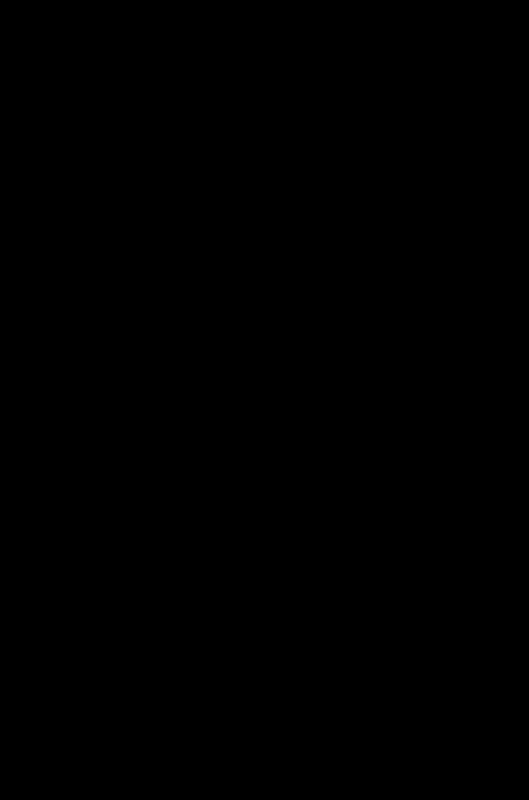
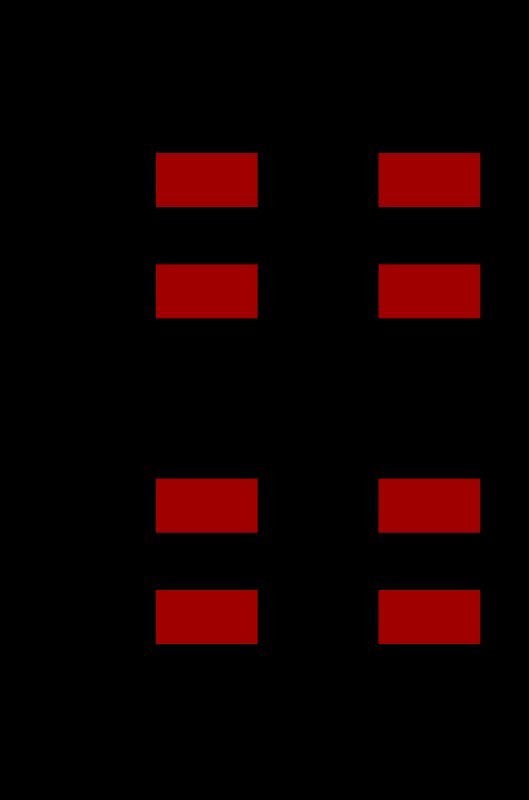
part: none -> (318, 235)
part: none -> (318, 561)

